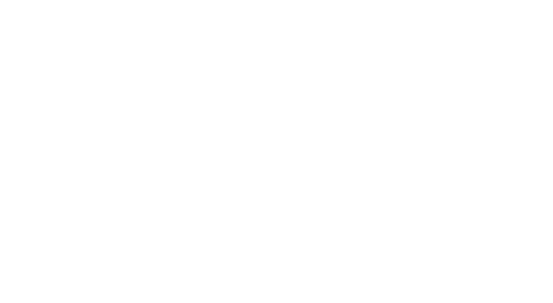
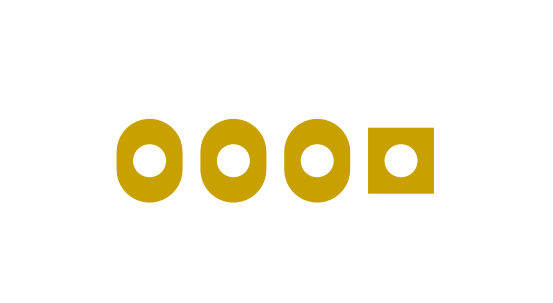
part: none -> (275, 160)

